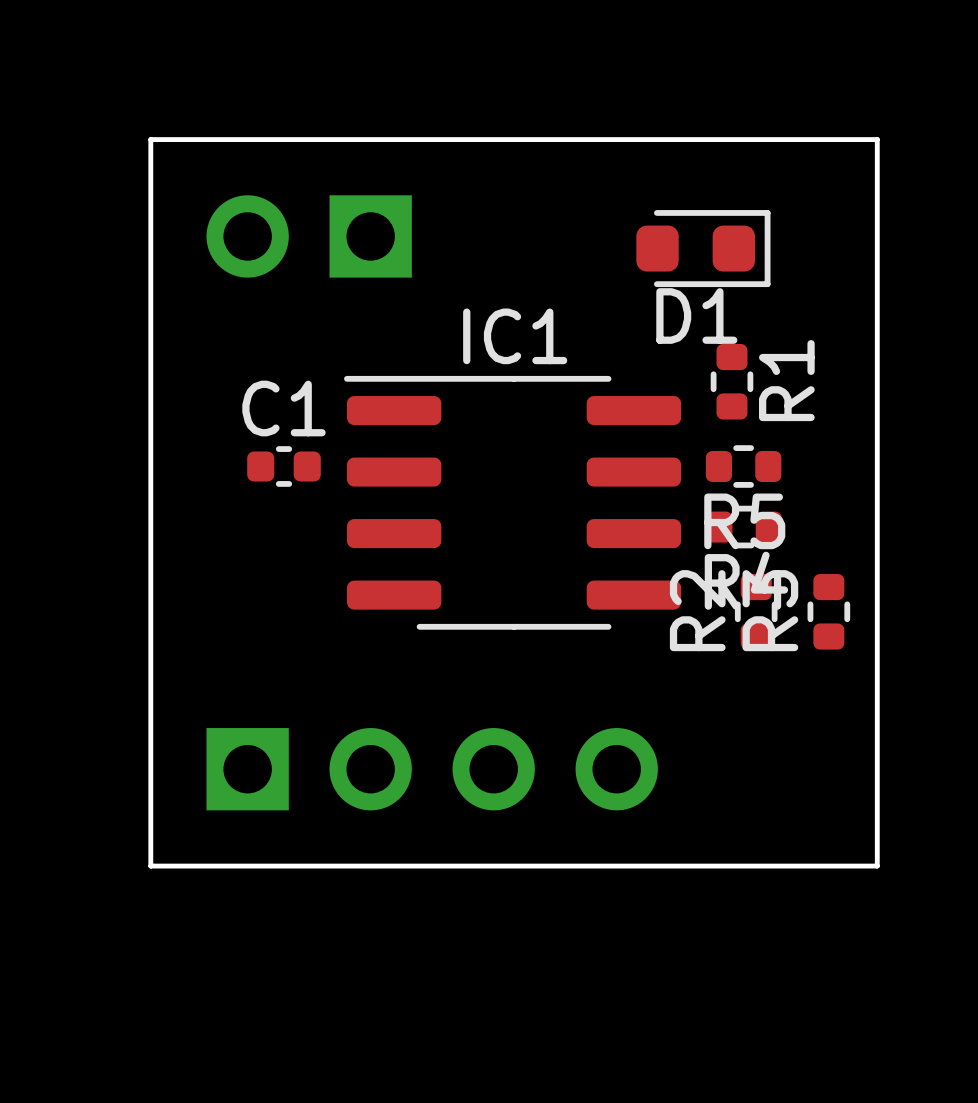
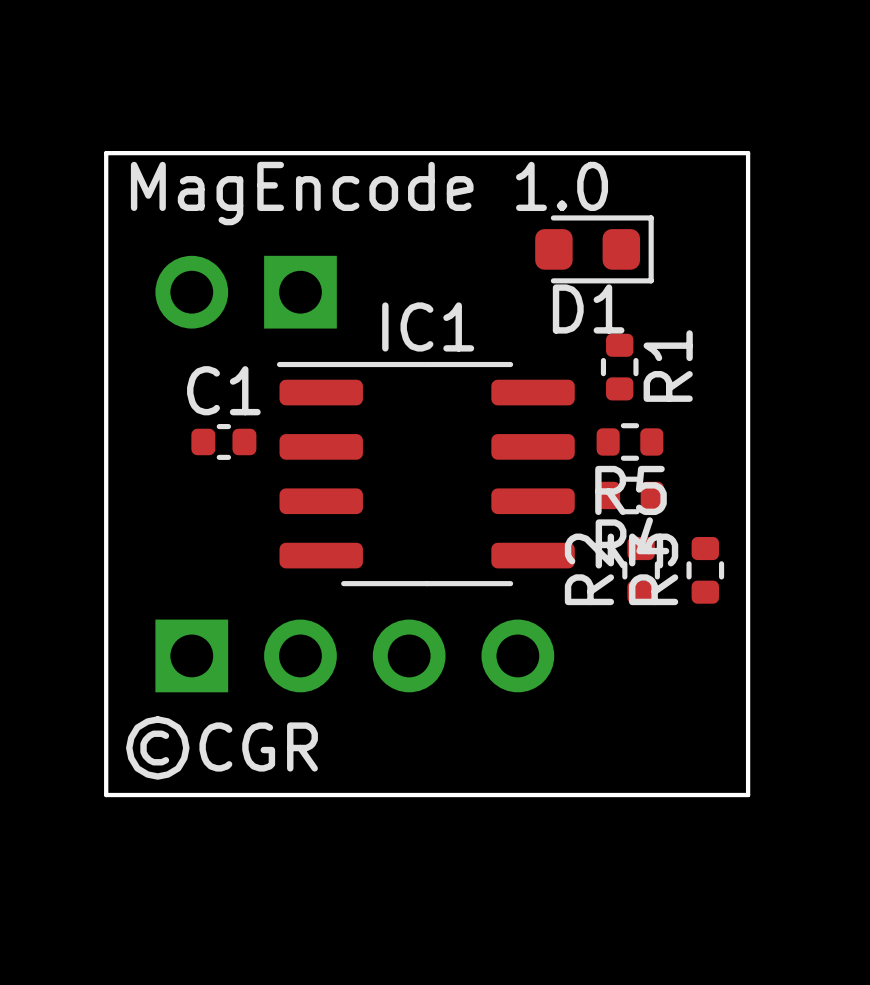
text: none -> MagEncode 1.0 (369, 193)
part position: (309, 236) -> (246, 292)
part position: (432, 769) -> (354, 655)
text: none -> ©CGR (221, 748)

